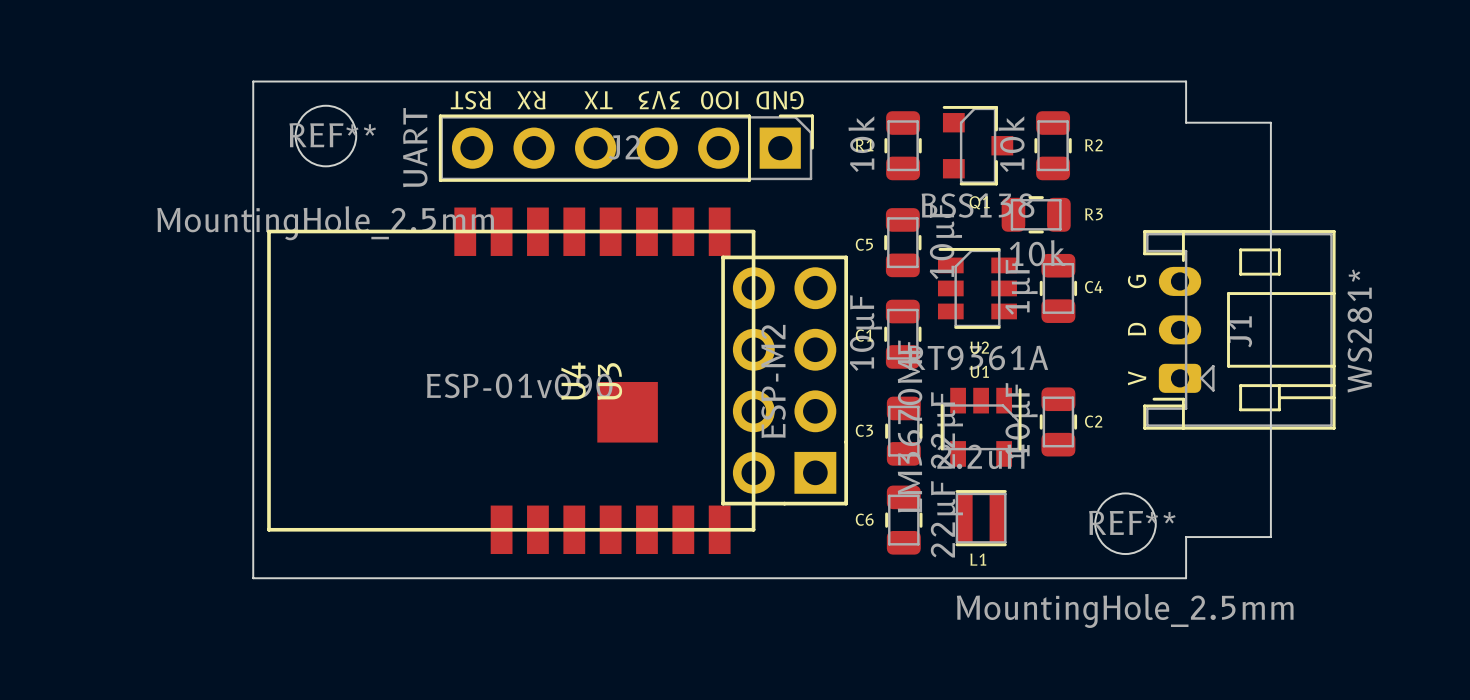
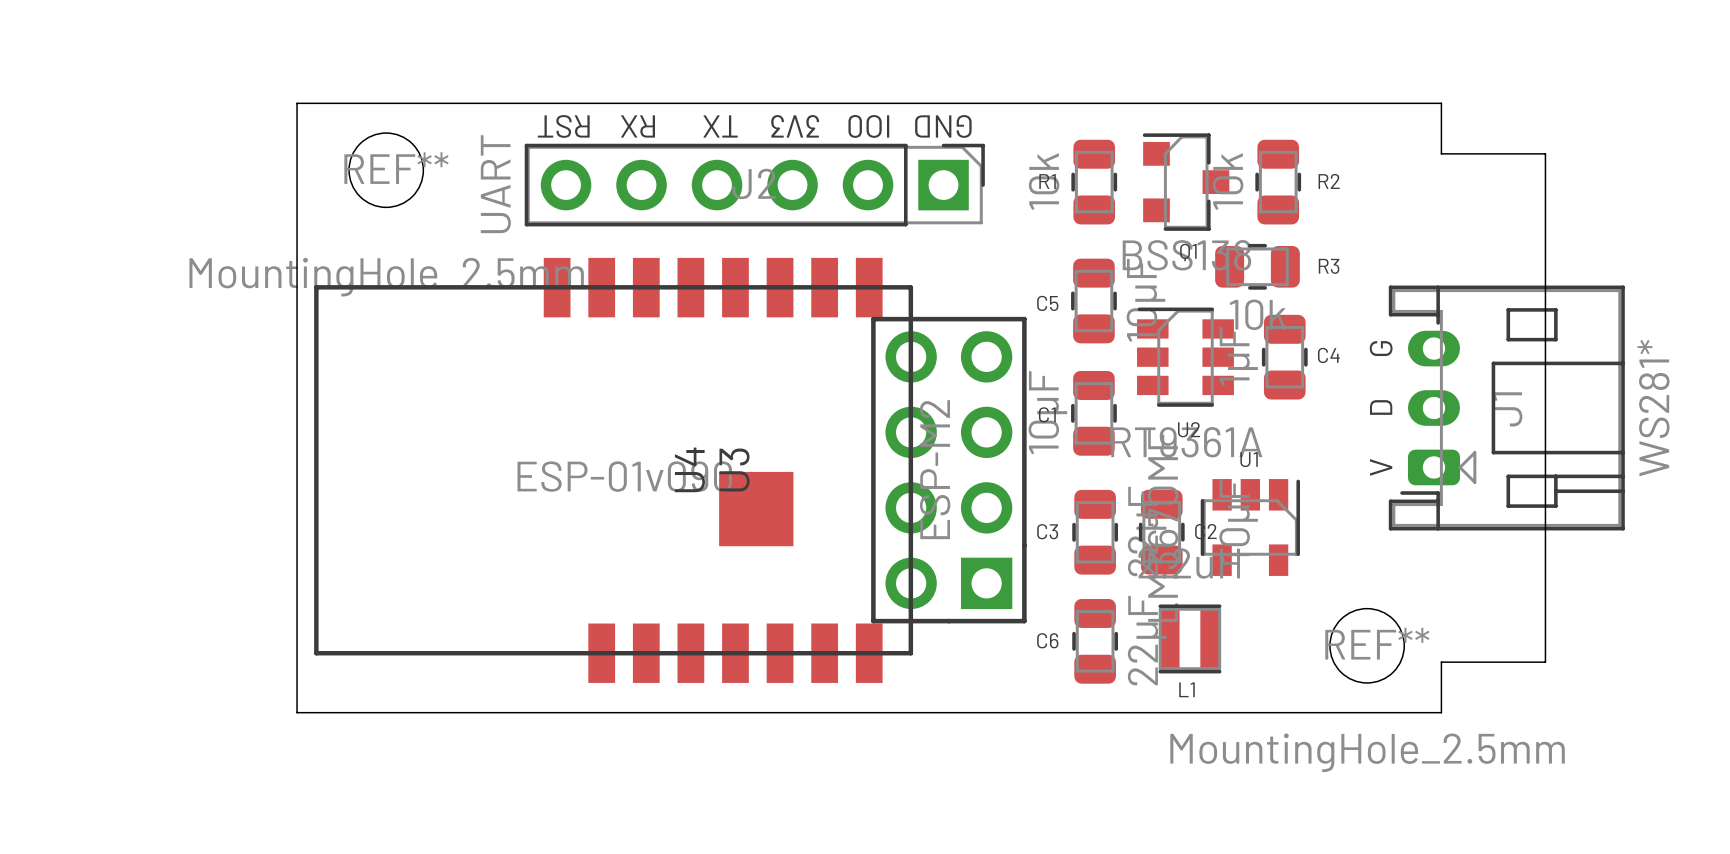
C2 position: (1058, 421) -> (1161, 532)
U1 position: (981, 427) -> (1250, 527)

